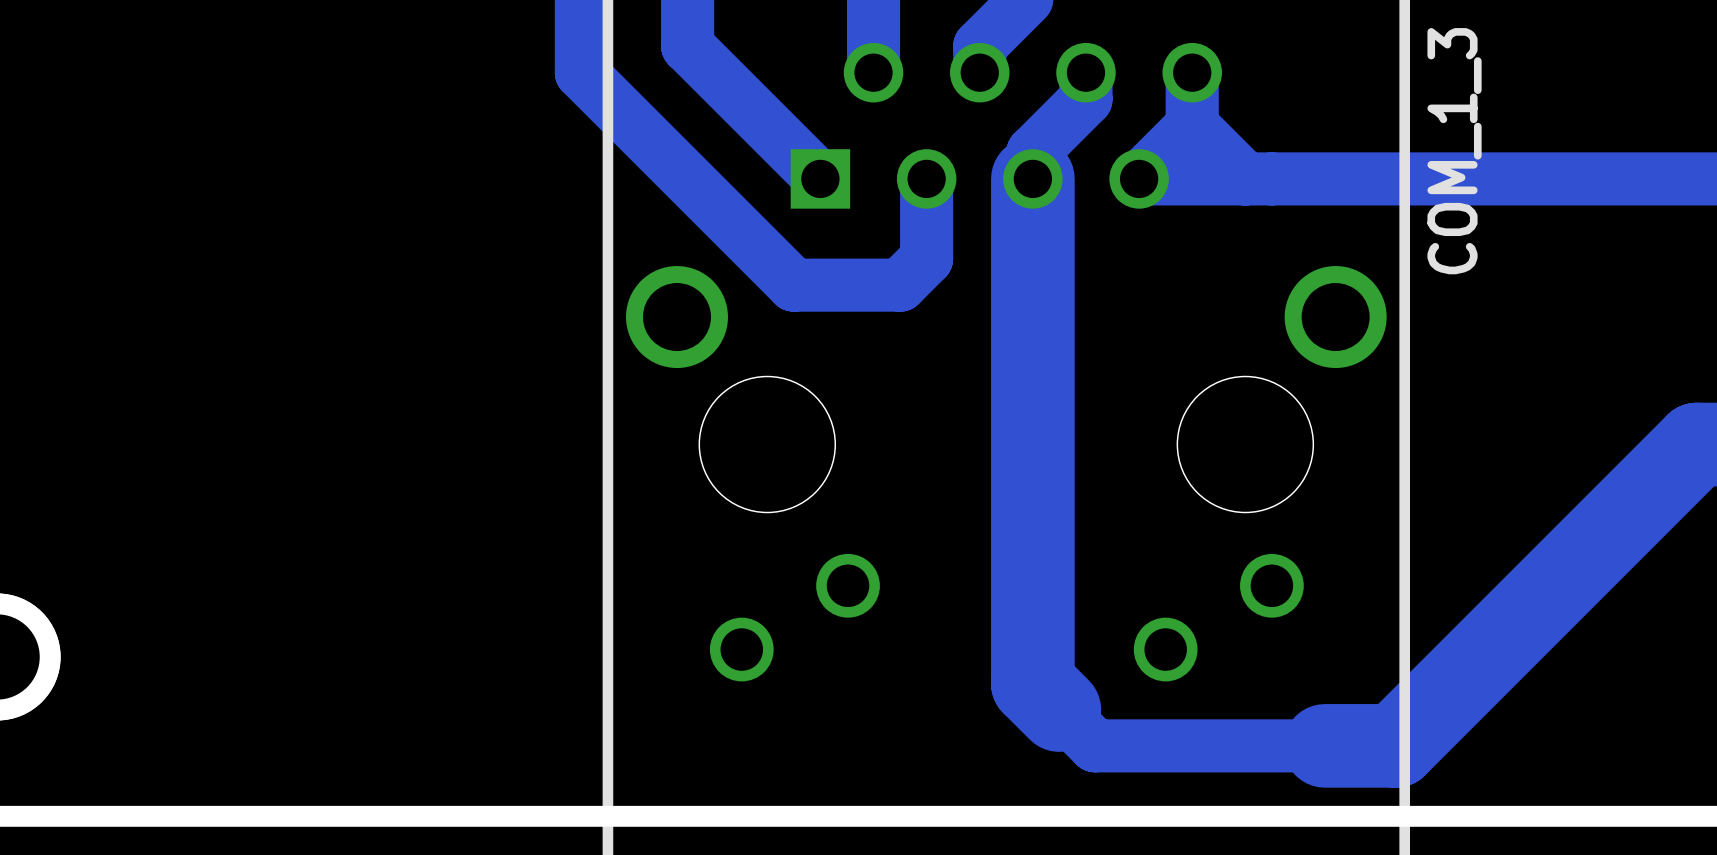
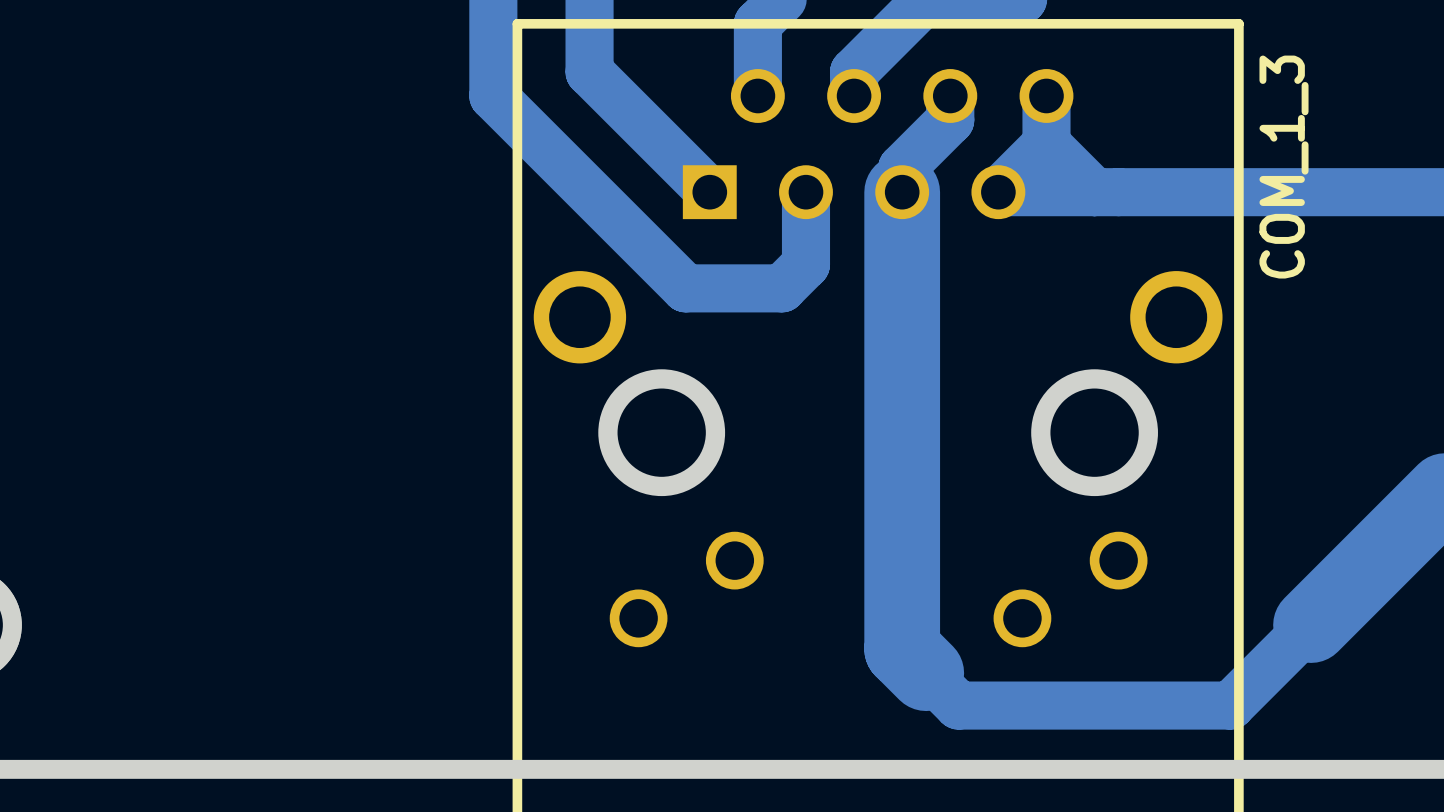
round board edge: none -> [598, 369, 726, 497]
round board edge: none -> [1031, 369, 1158, 497]
bottom track width: thick (1484, 656) (1395, 745) (1325, 745) -> thin (1311, 625) (1230, 705) (1166, 705)

